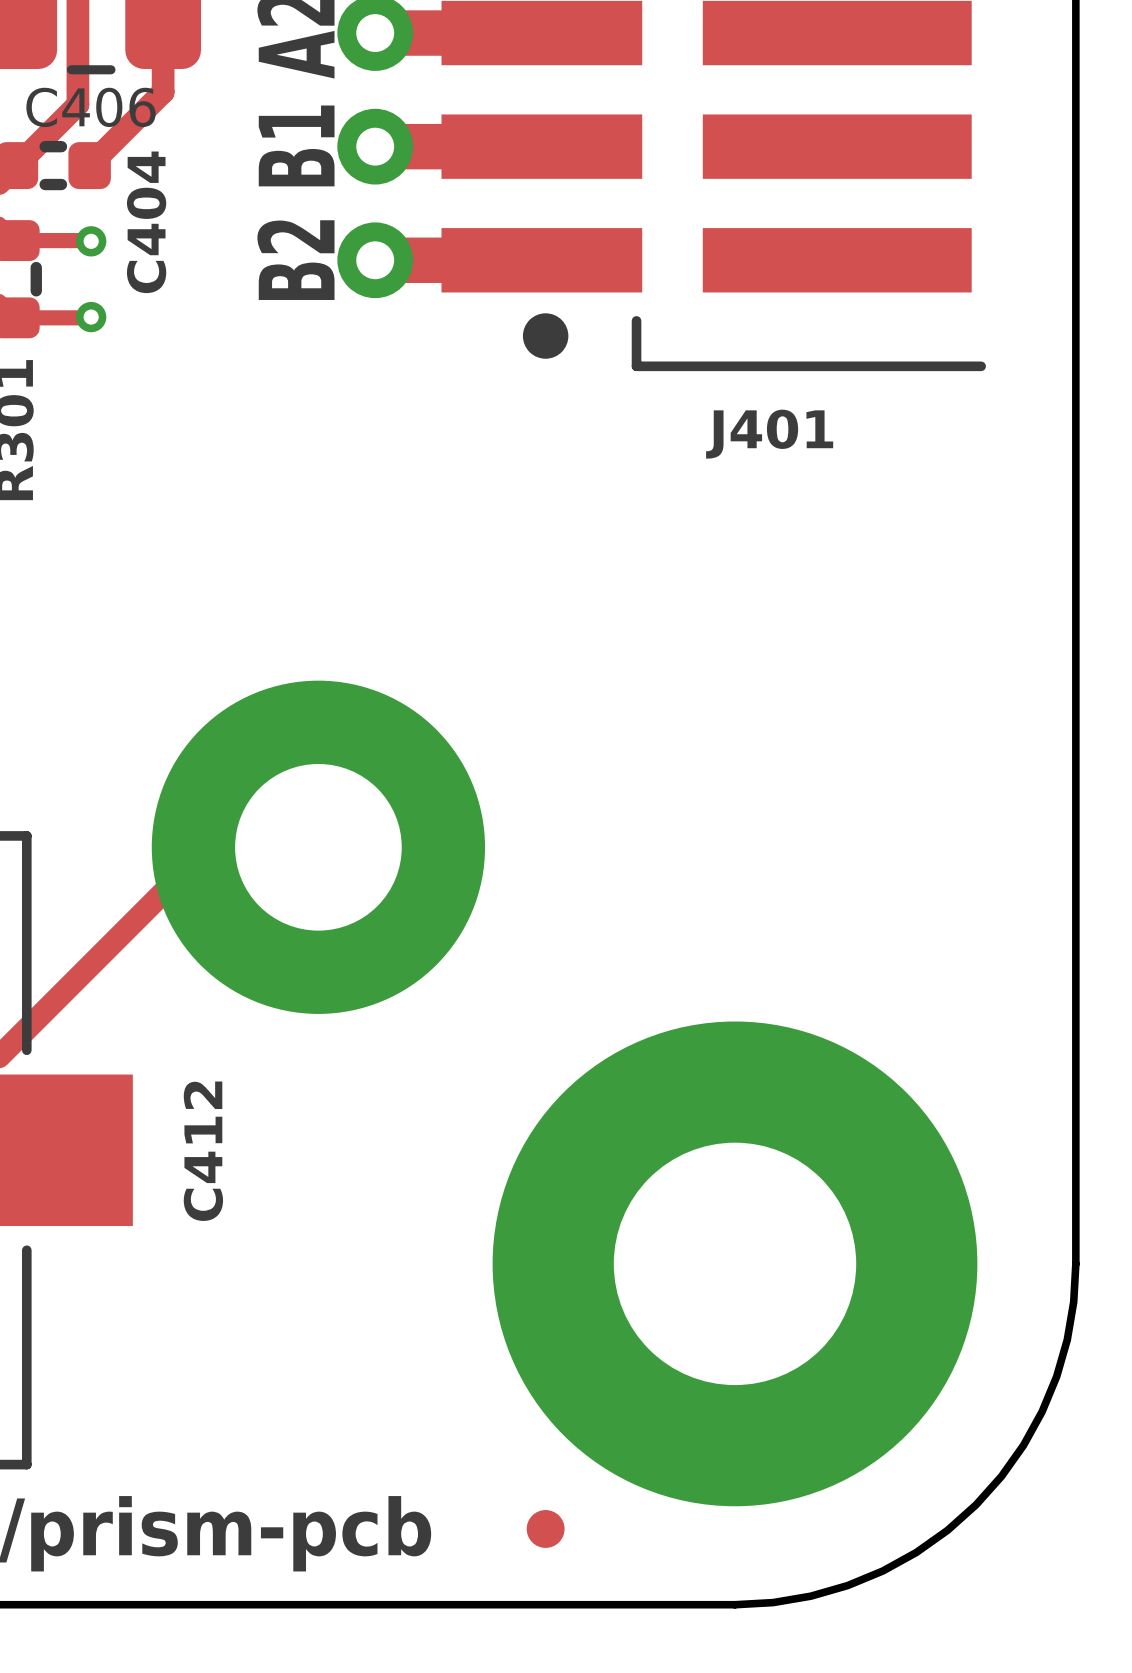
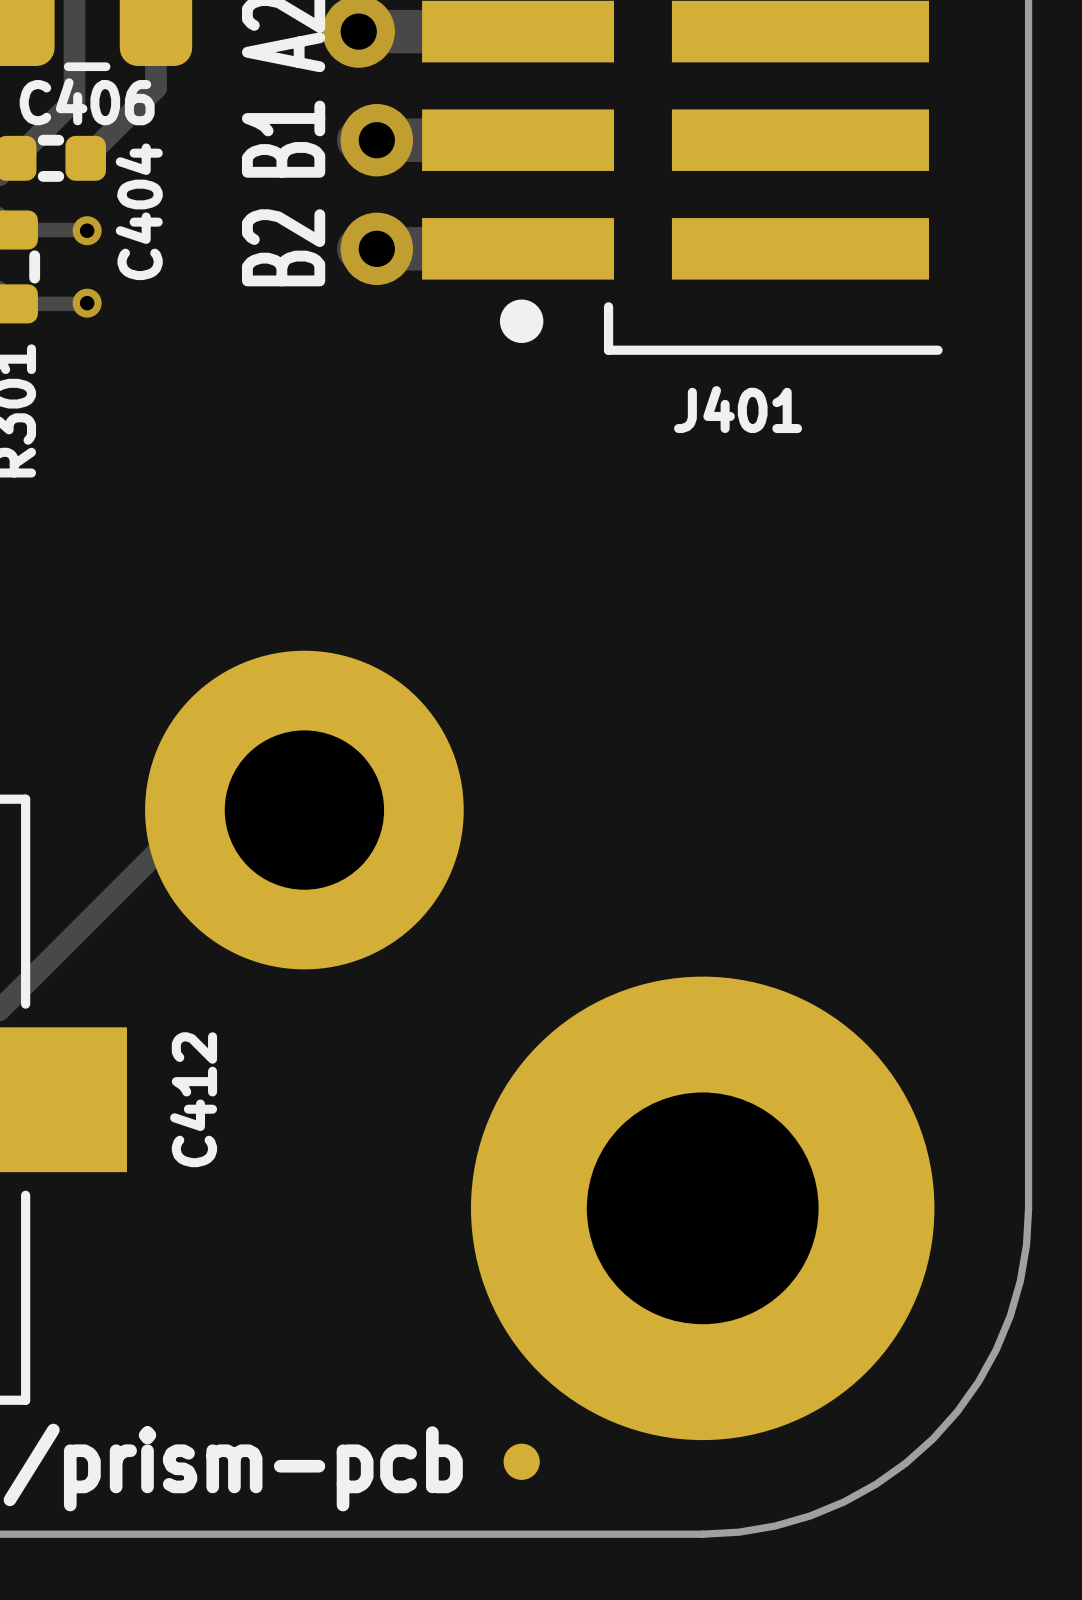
via position: (375, 146) -> (376, 140)
via position: (375, 260) -> (376, 248)

